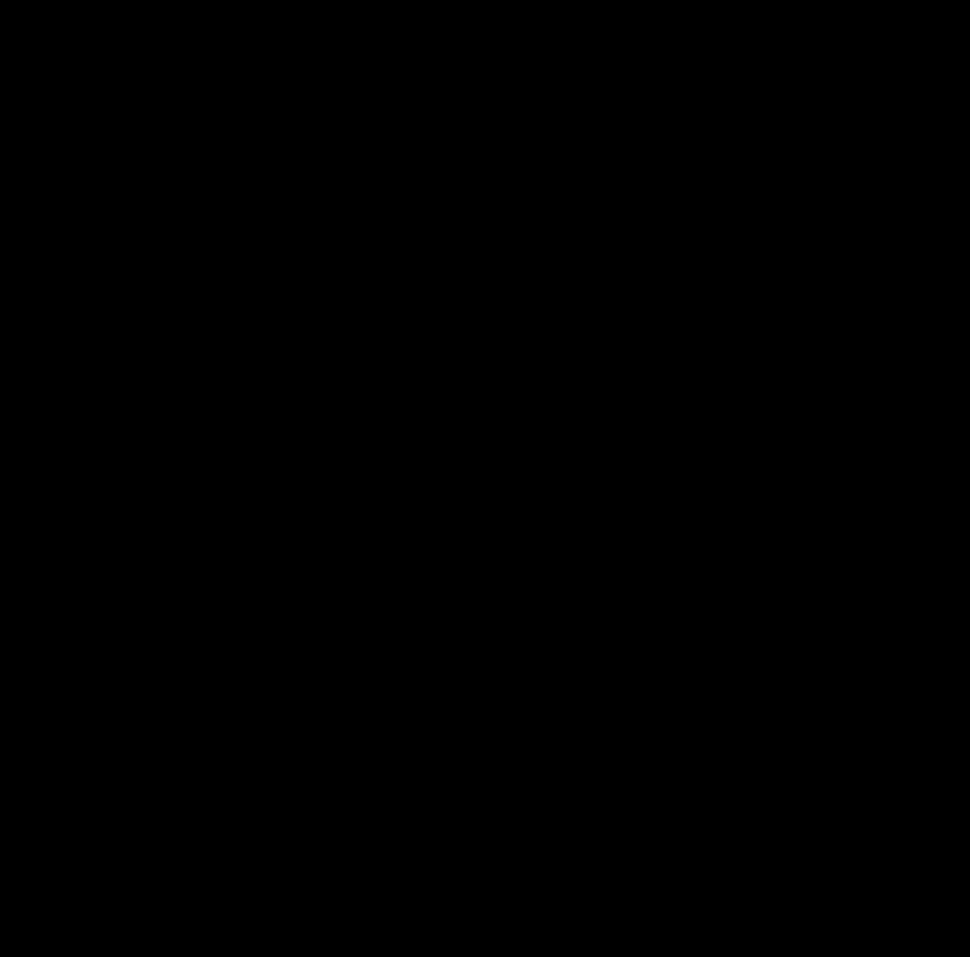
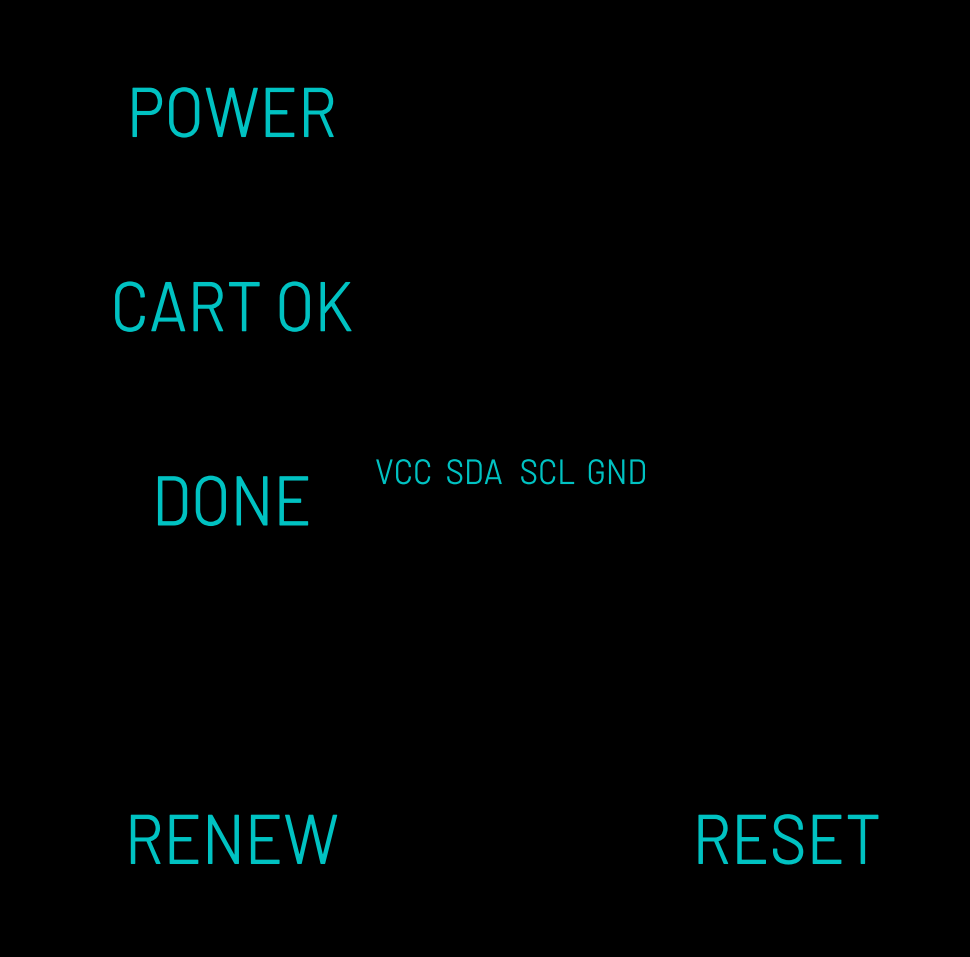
text: none -> POWER (233, 112)
text: none -> CART OK (233, 306)
text: none -> VCC (403, 471)
text: none -> SDA (474, 471)
text: none -> SCL (547, 471)
text: none -> GND (616, 471)
text: none -> DONE (233, 500)
text: none -> RENEW (234, 839)
text: none -> RESET (788, 839)

